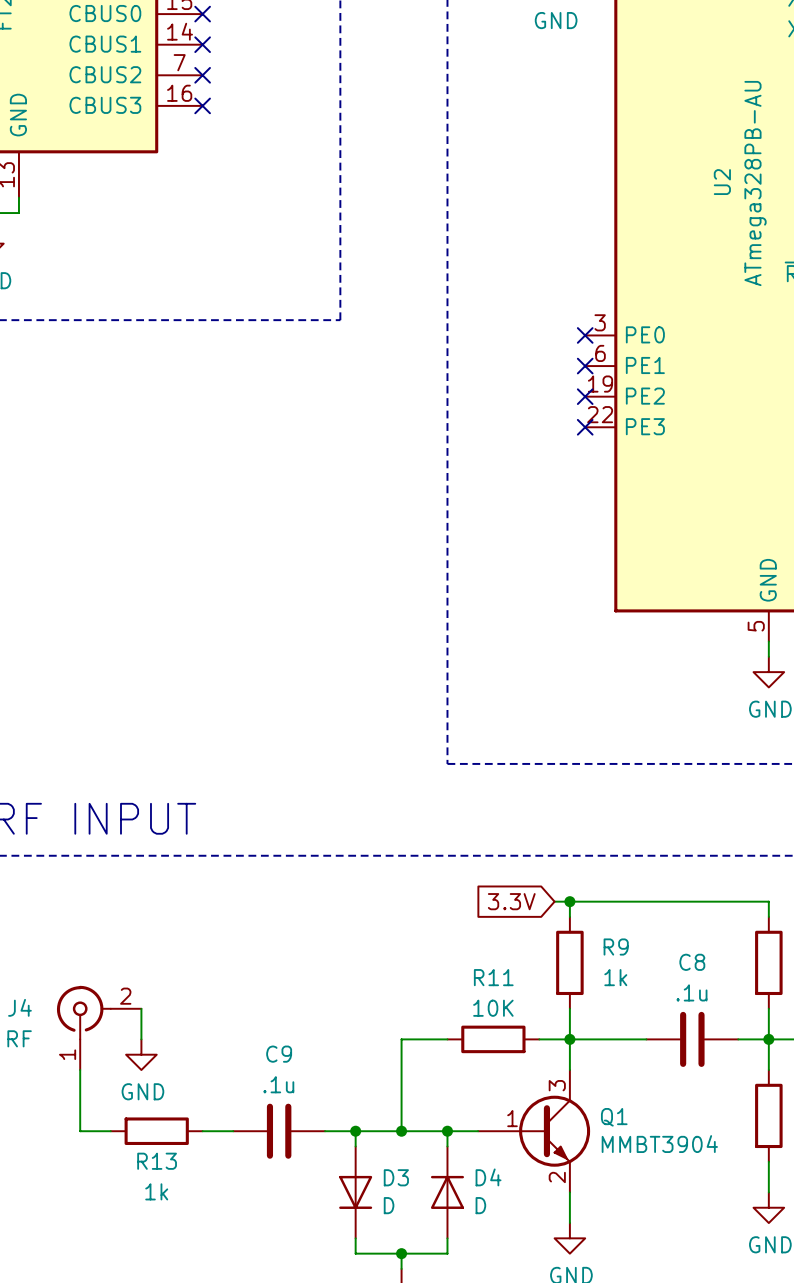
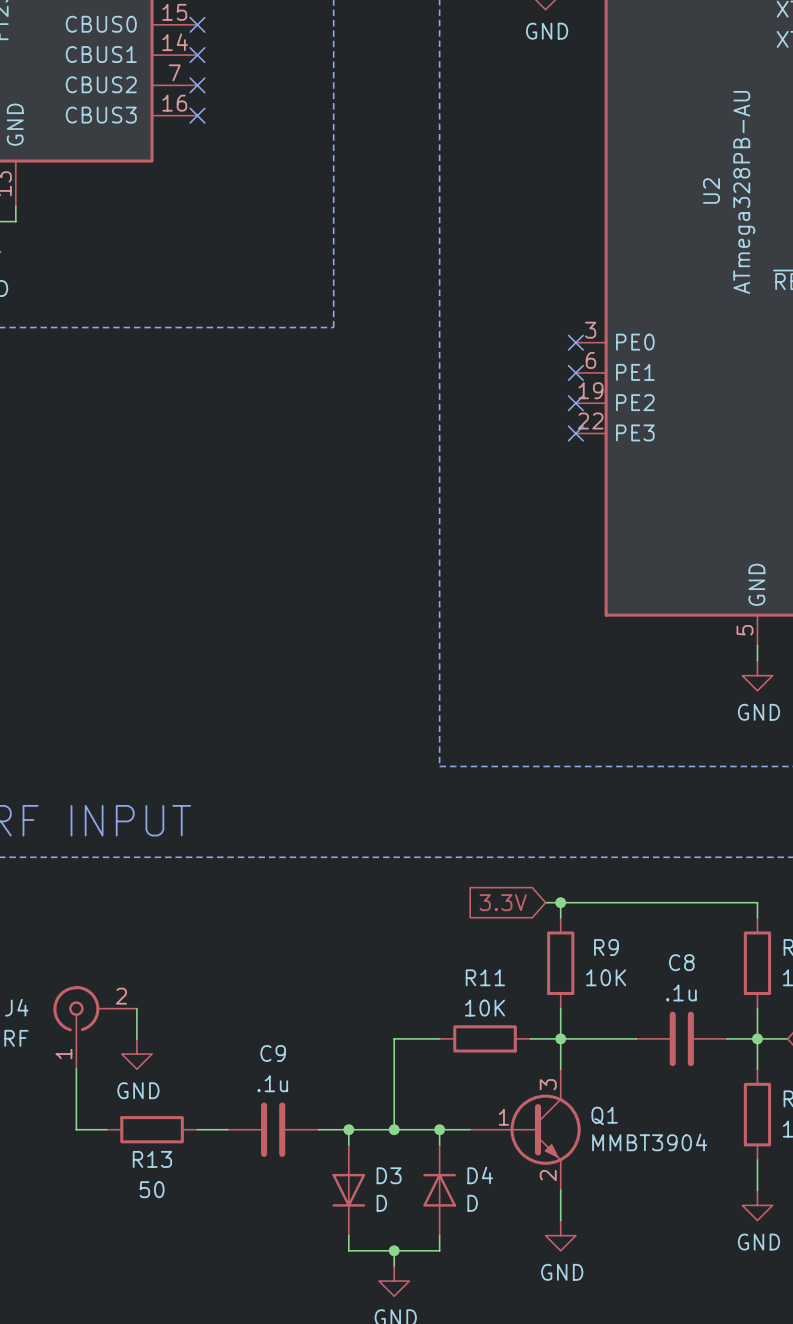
R9 value: 1k (615, 977) -> 10K (606, 977)
R13 value: 1k (156, 1191) -> 50 (152, 1189)

